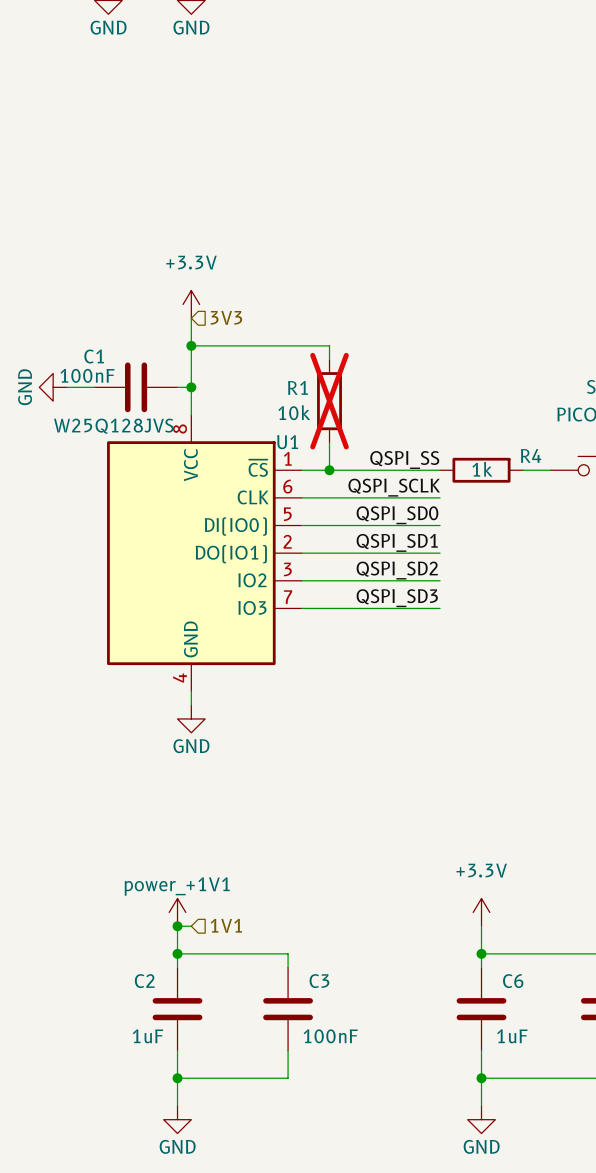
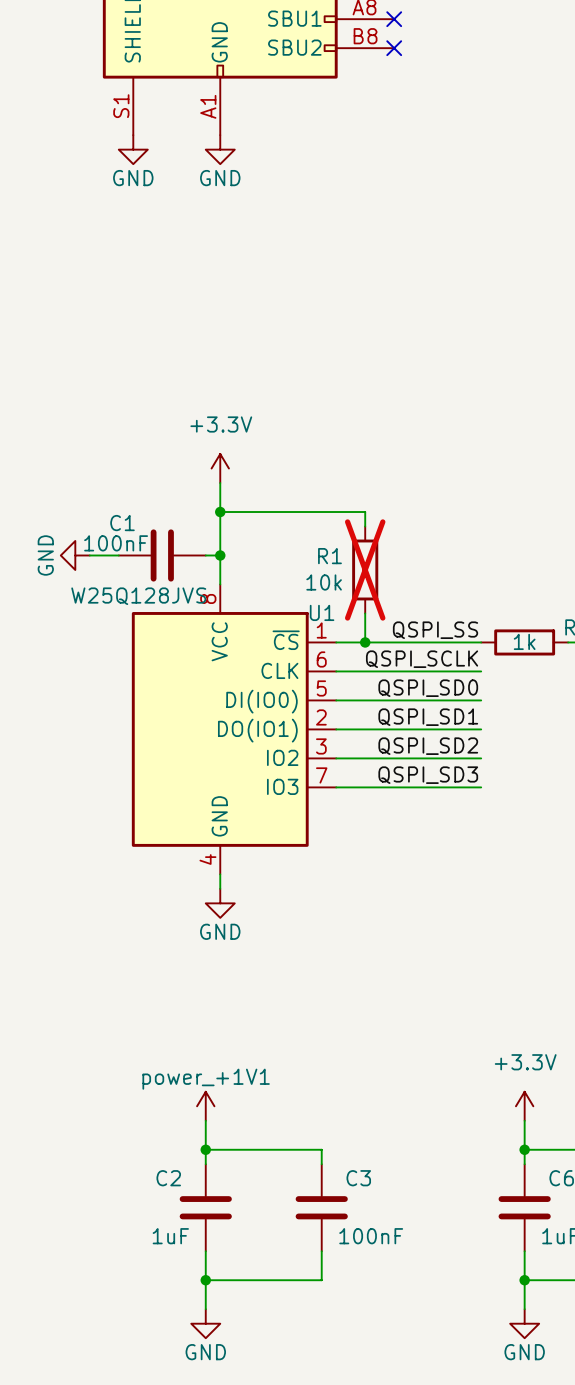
hierarchical label: 3V3 (226, 317) -> none
hierarchical label: 1V1 (226, 925) -> none
wire: (177, 926) (191, 926) -> none
junction: (177, 926) -> none

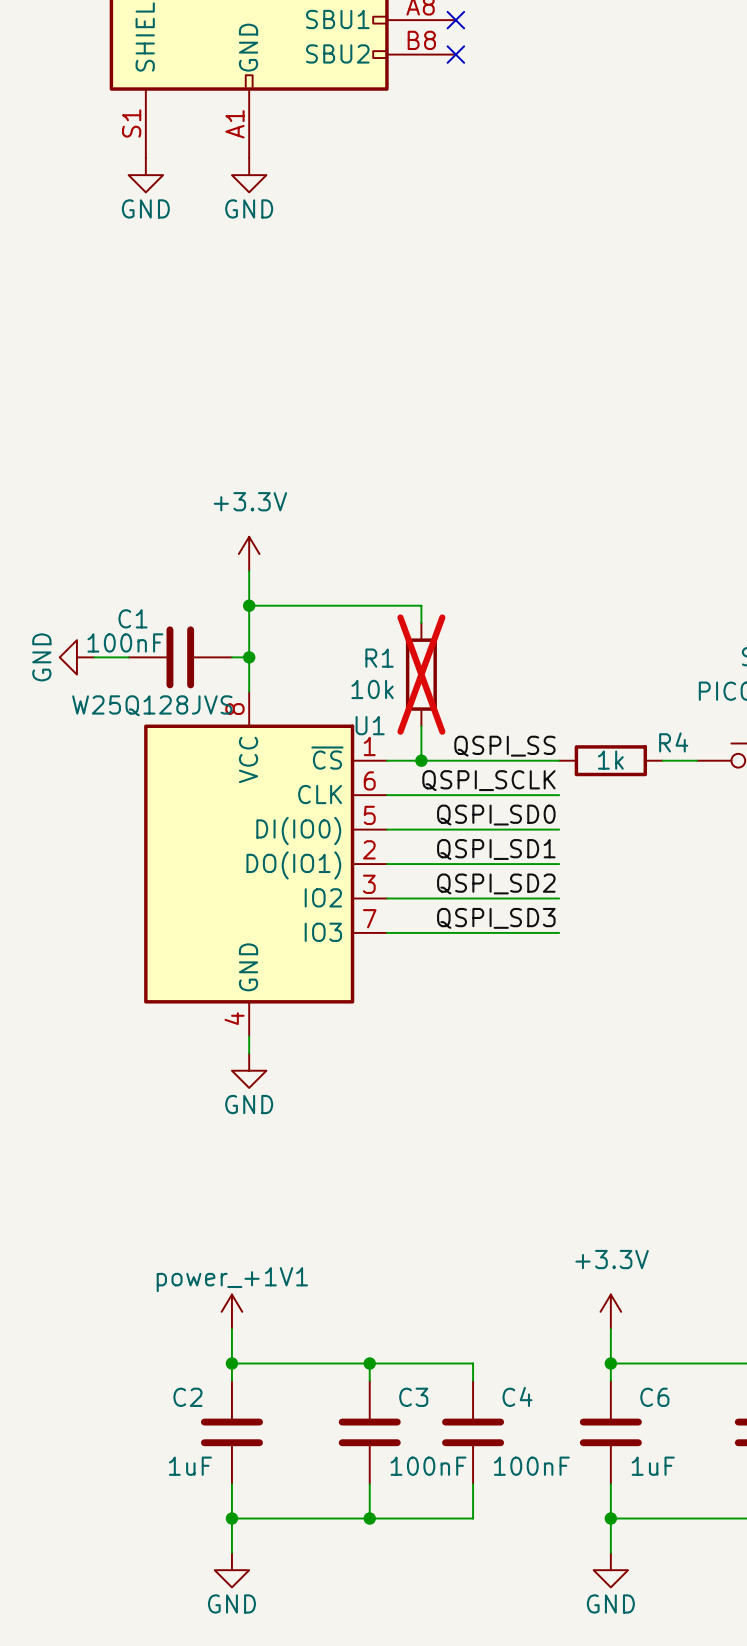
wire: none -> (369, 1363) (473, 1363) (473, 1380)
junction: none -> (369, 1363)
C4: none -> 100nF (473, 1432)
wire: none -> (473, 1484) (473, 1518) (369, 1518)
junction: none -> (369, 1518)

